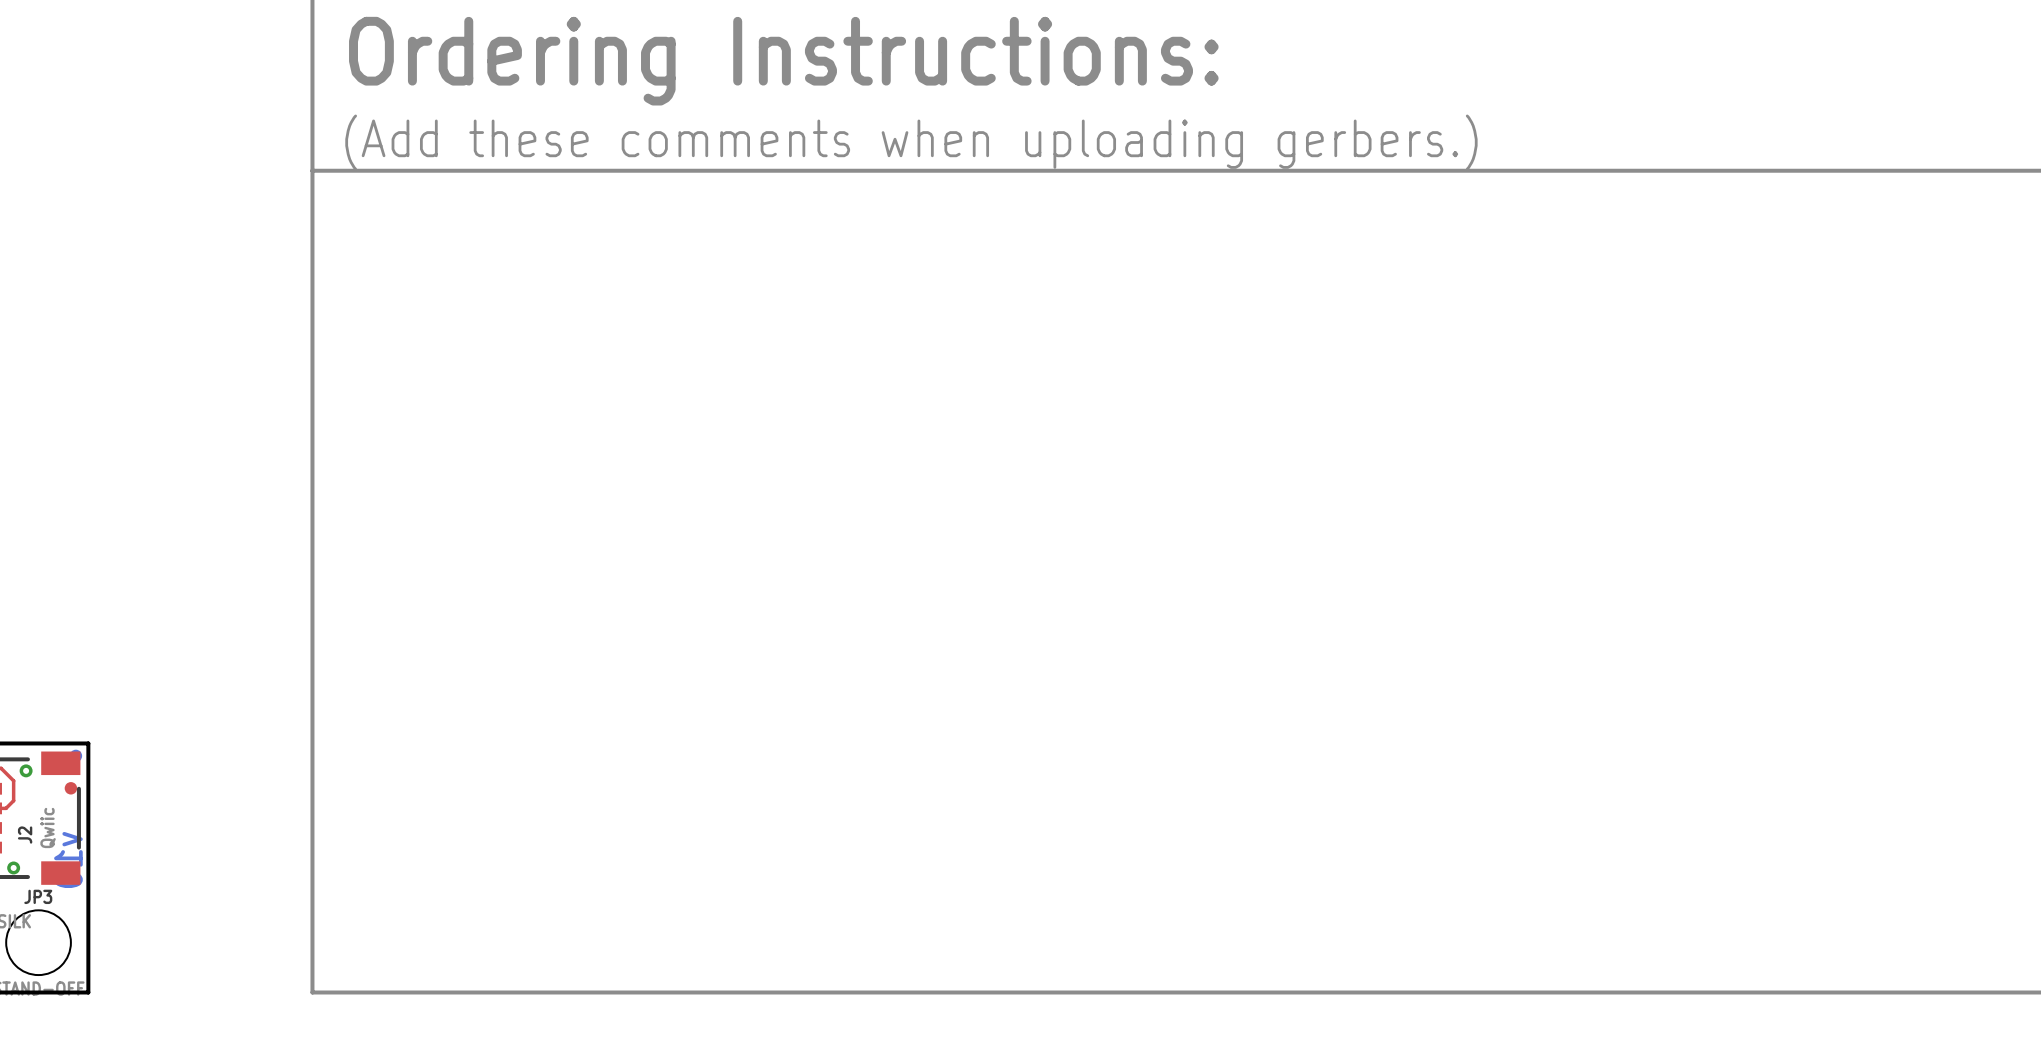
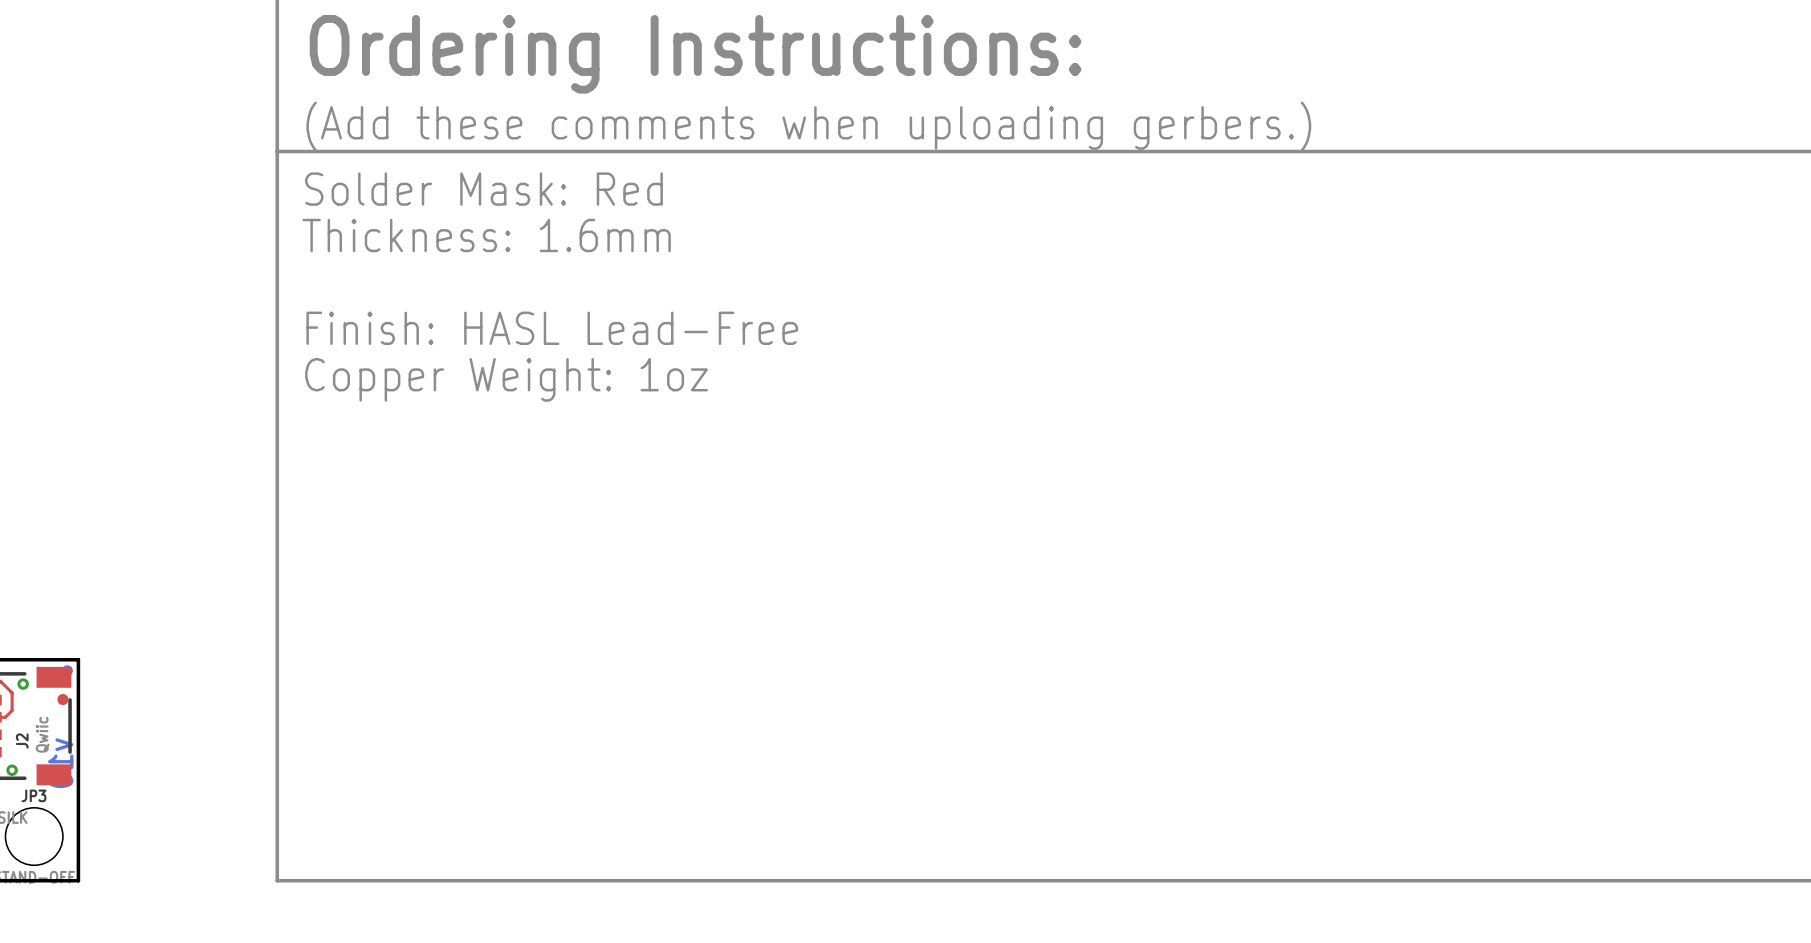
text: none -> Solder Mask: Red (483, 189)
text: none -> Thickness: 1.6mm (486, 235)
text: none -> Finish: HASL Lead-Free (552, 328)
text: none -> Copper Weight: 1oz (506, 379)

